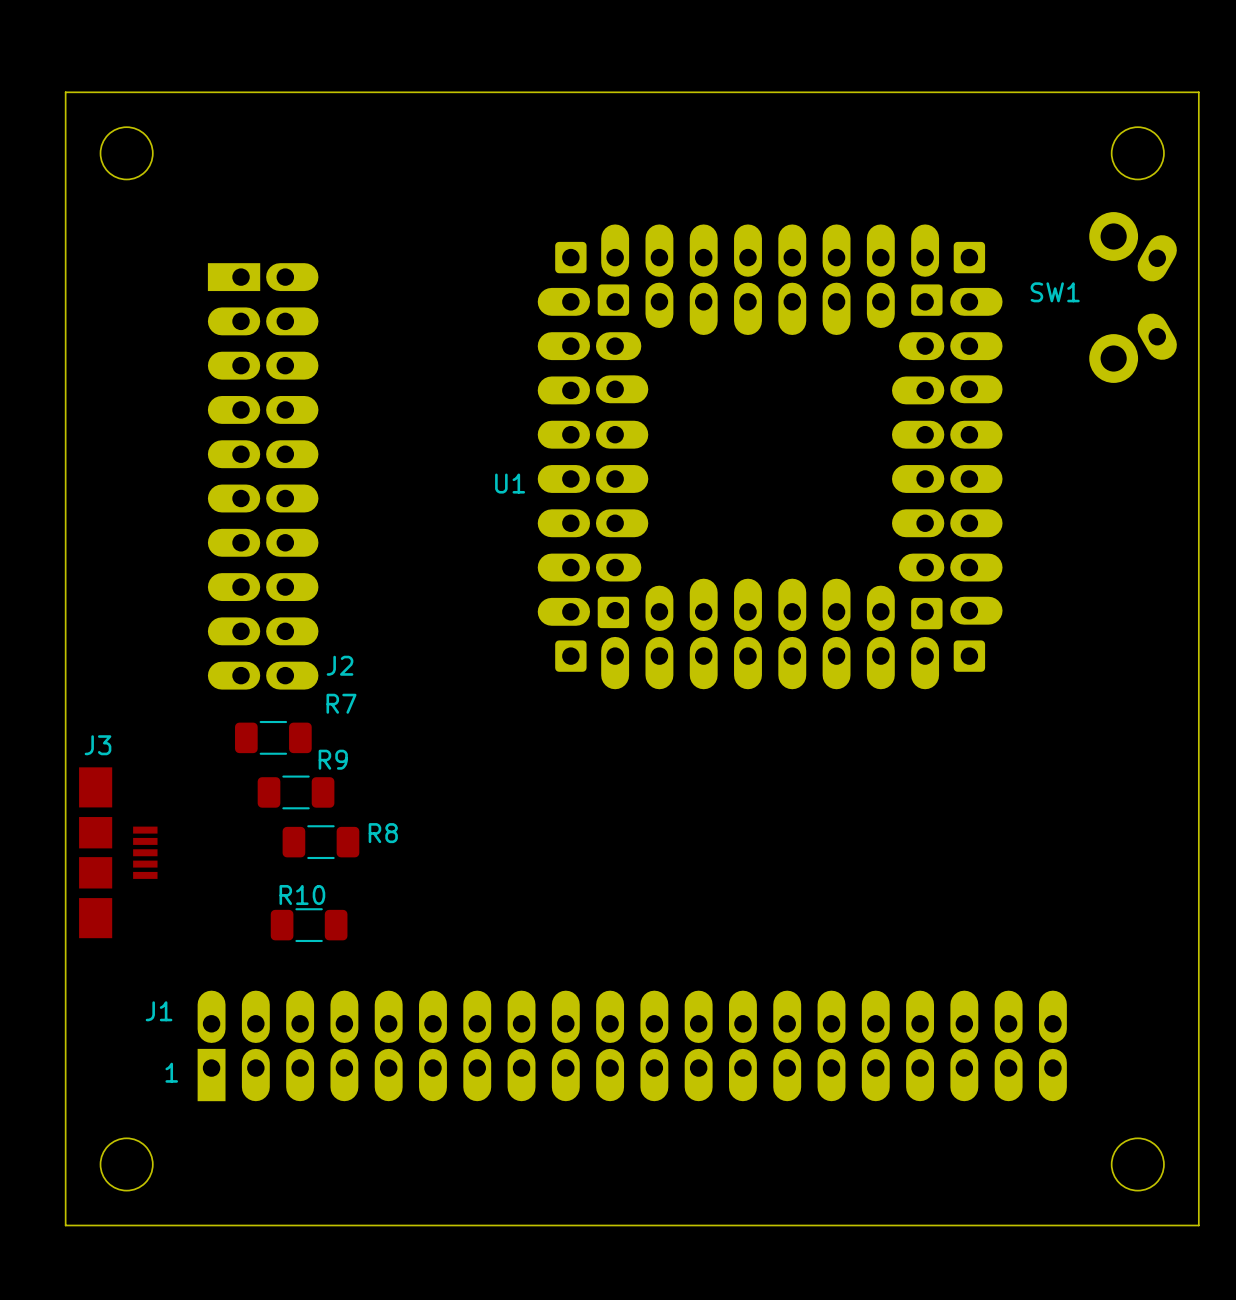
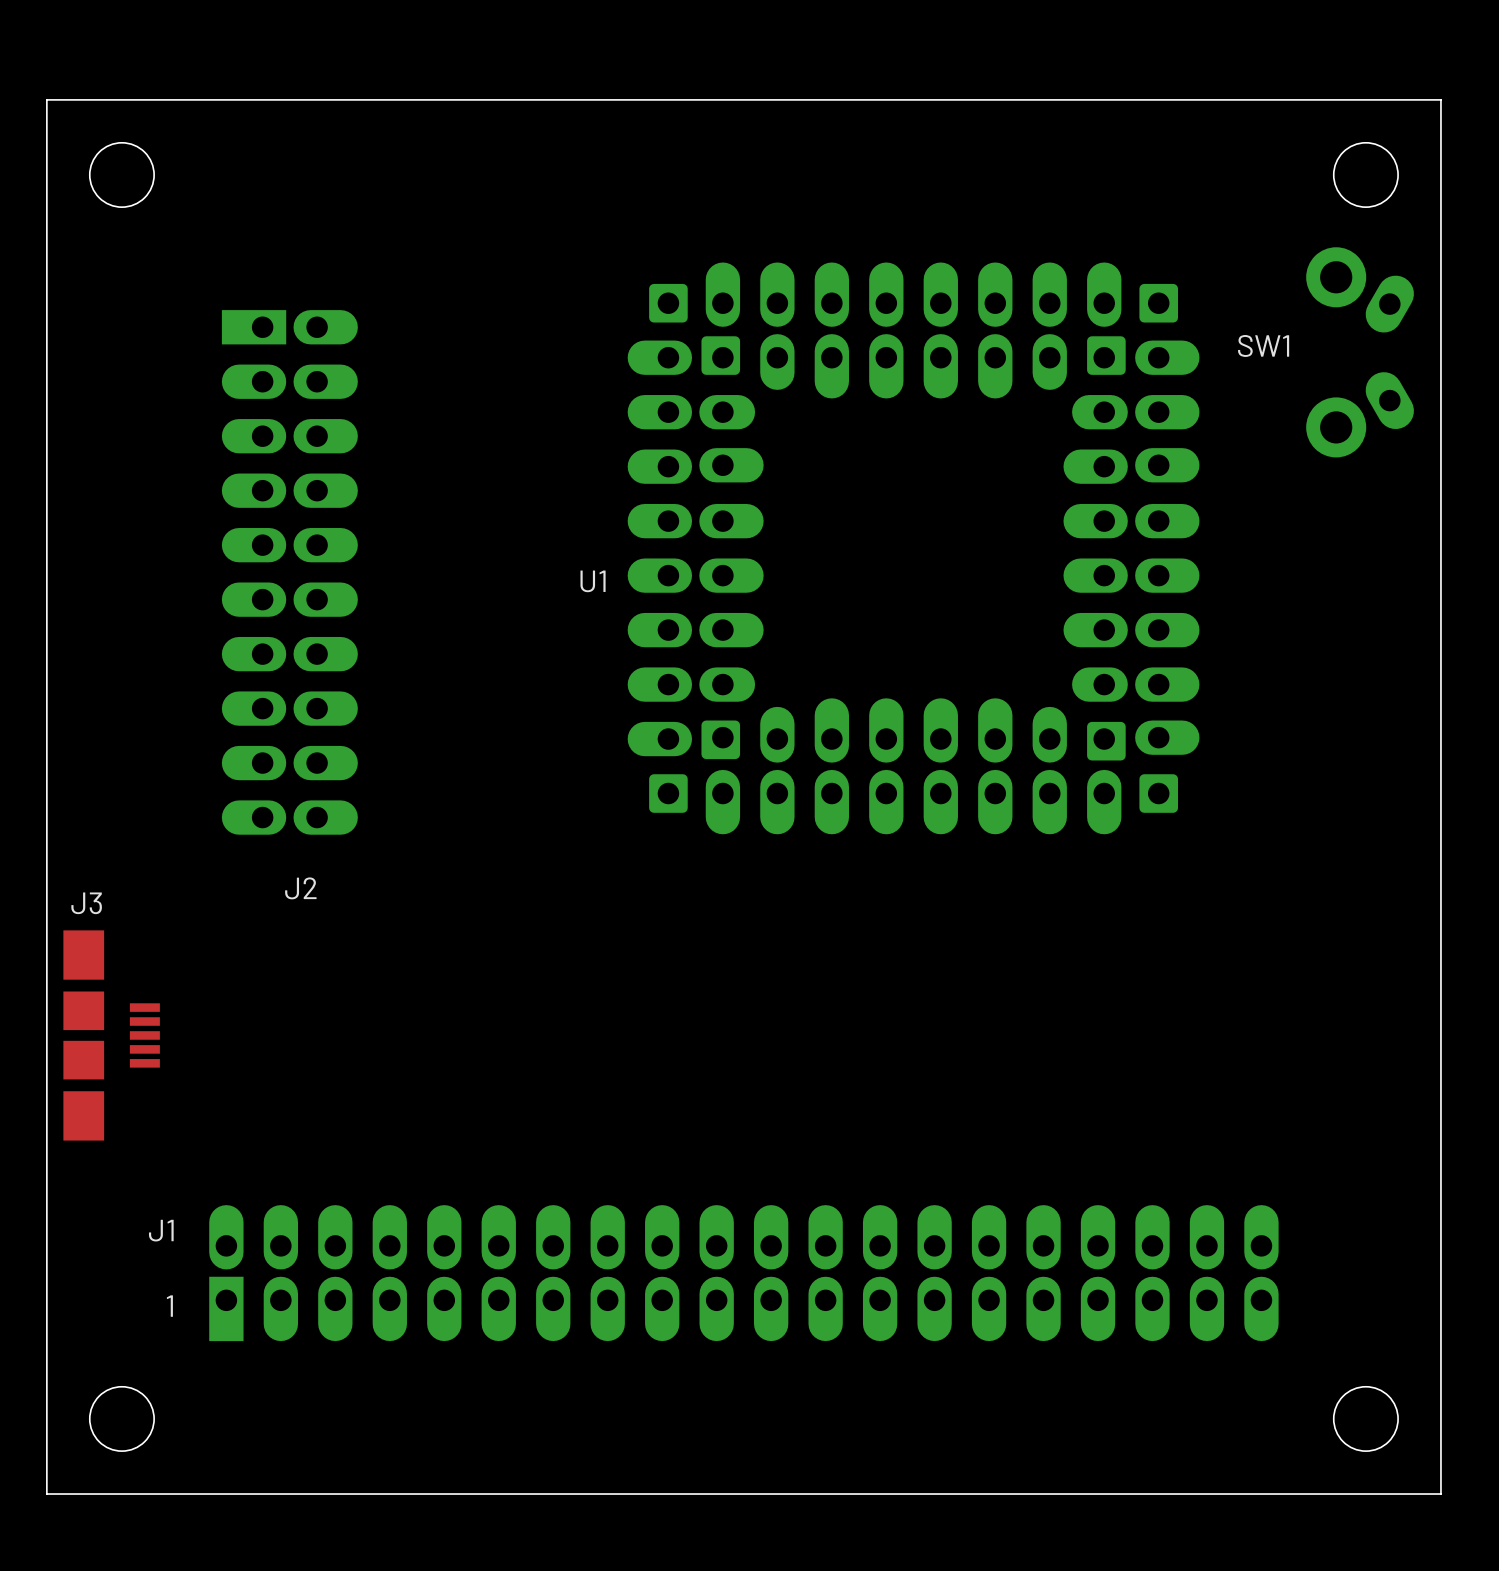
J2 name position: J2 (340, 665) -> J2 (300, 888)
R7: (273, 737) -> none
R9: (296, 792) -> none
R8: (320, 842) -> none
R10: (309, 925) -> none

